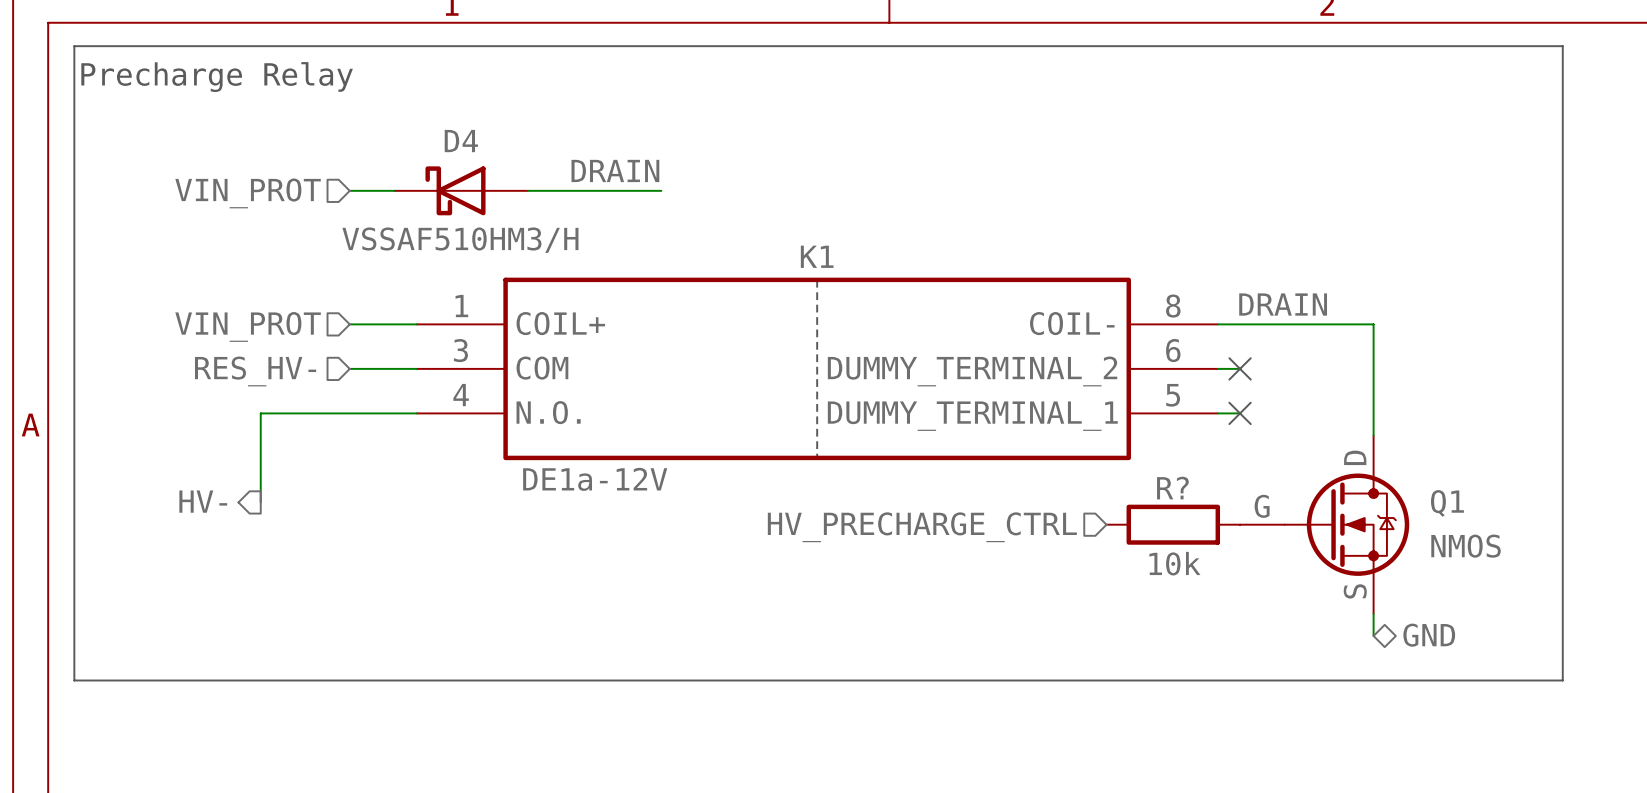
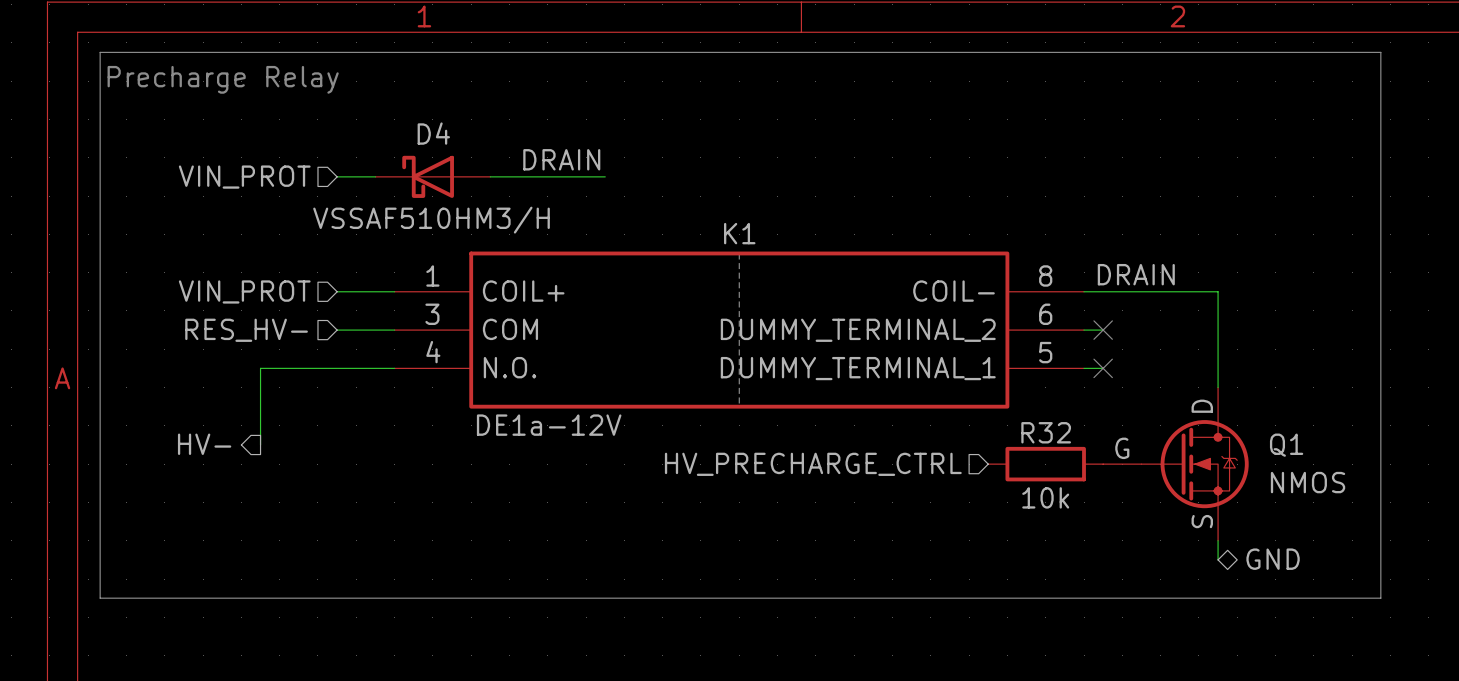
R? name: R? (1172, 488) -> R32 (1046, 432)

